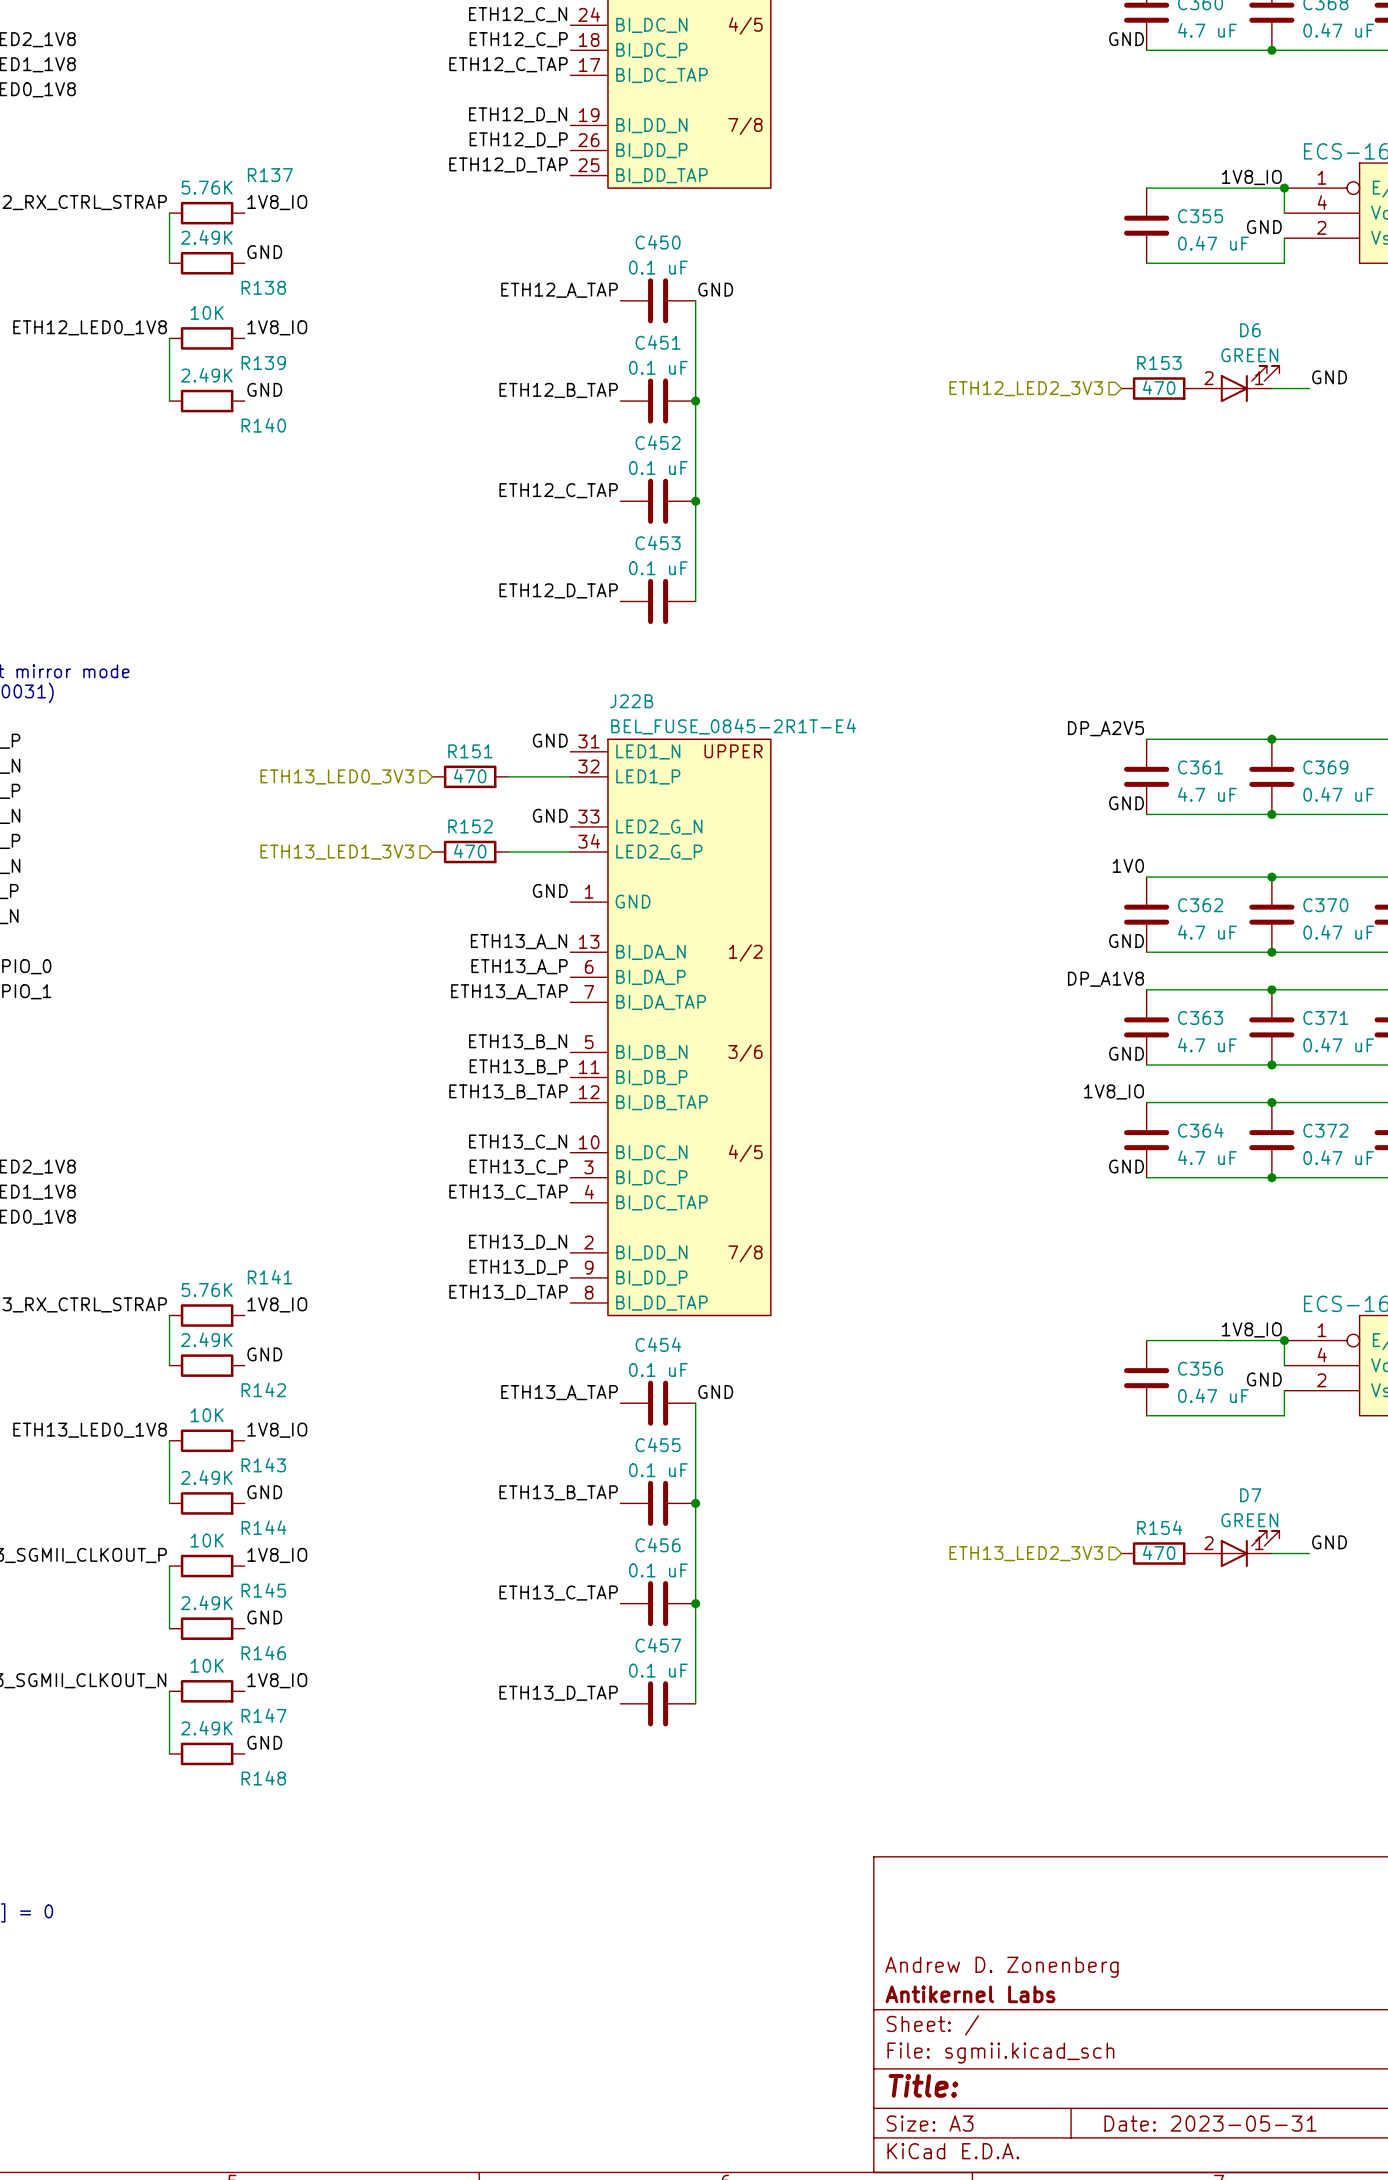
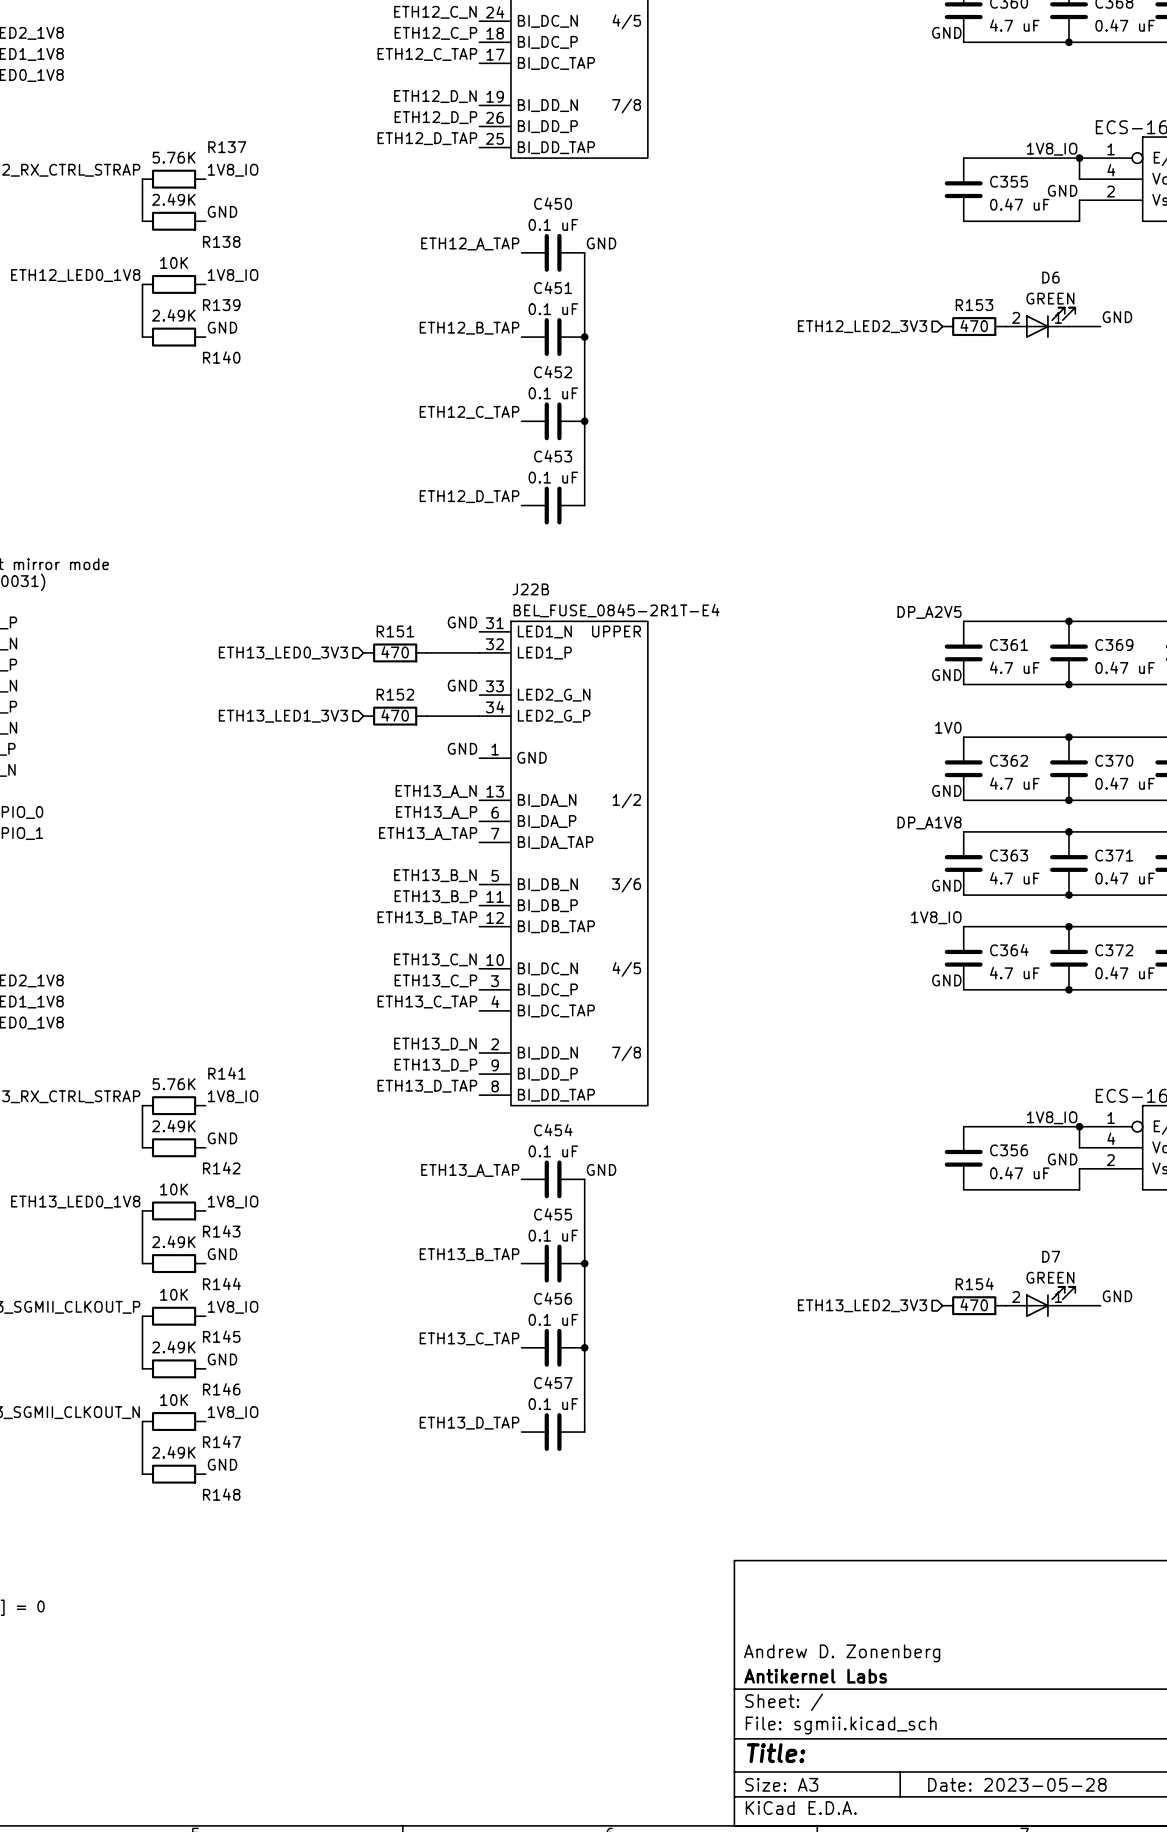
title block: Date: 2023-05-31 (1210, 2123) -> Date: 2023-05-28 (1017, 1784)

